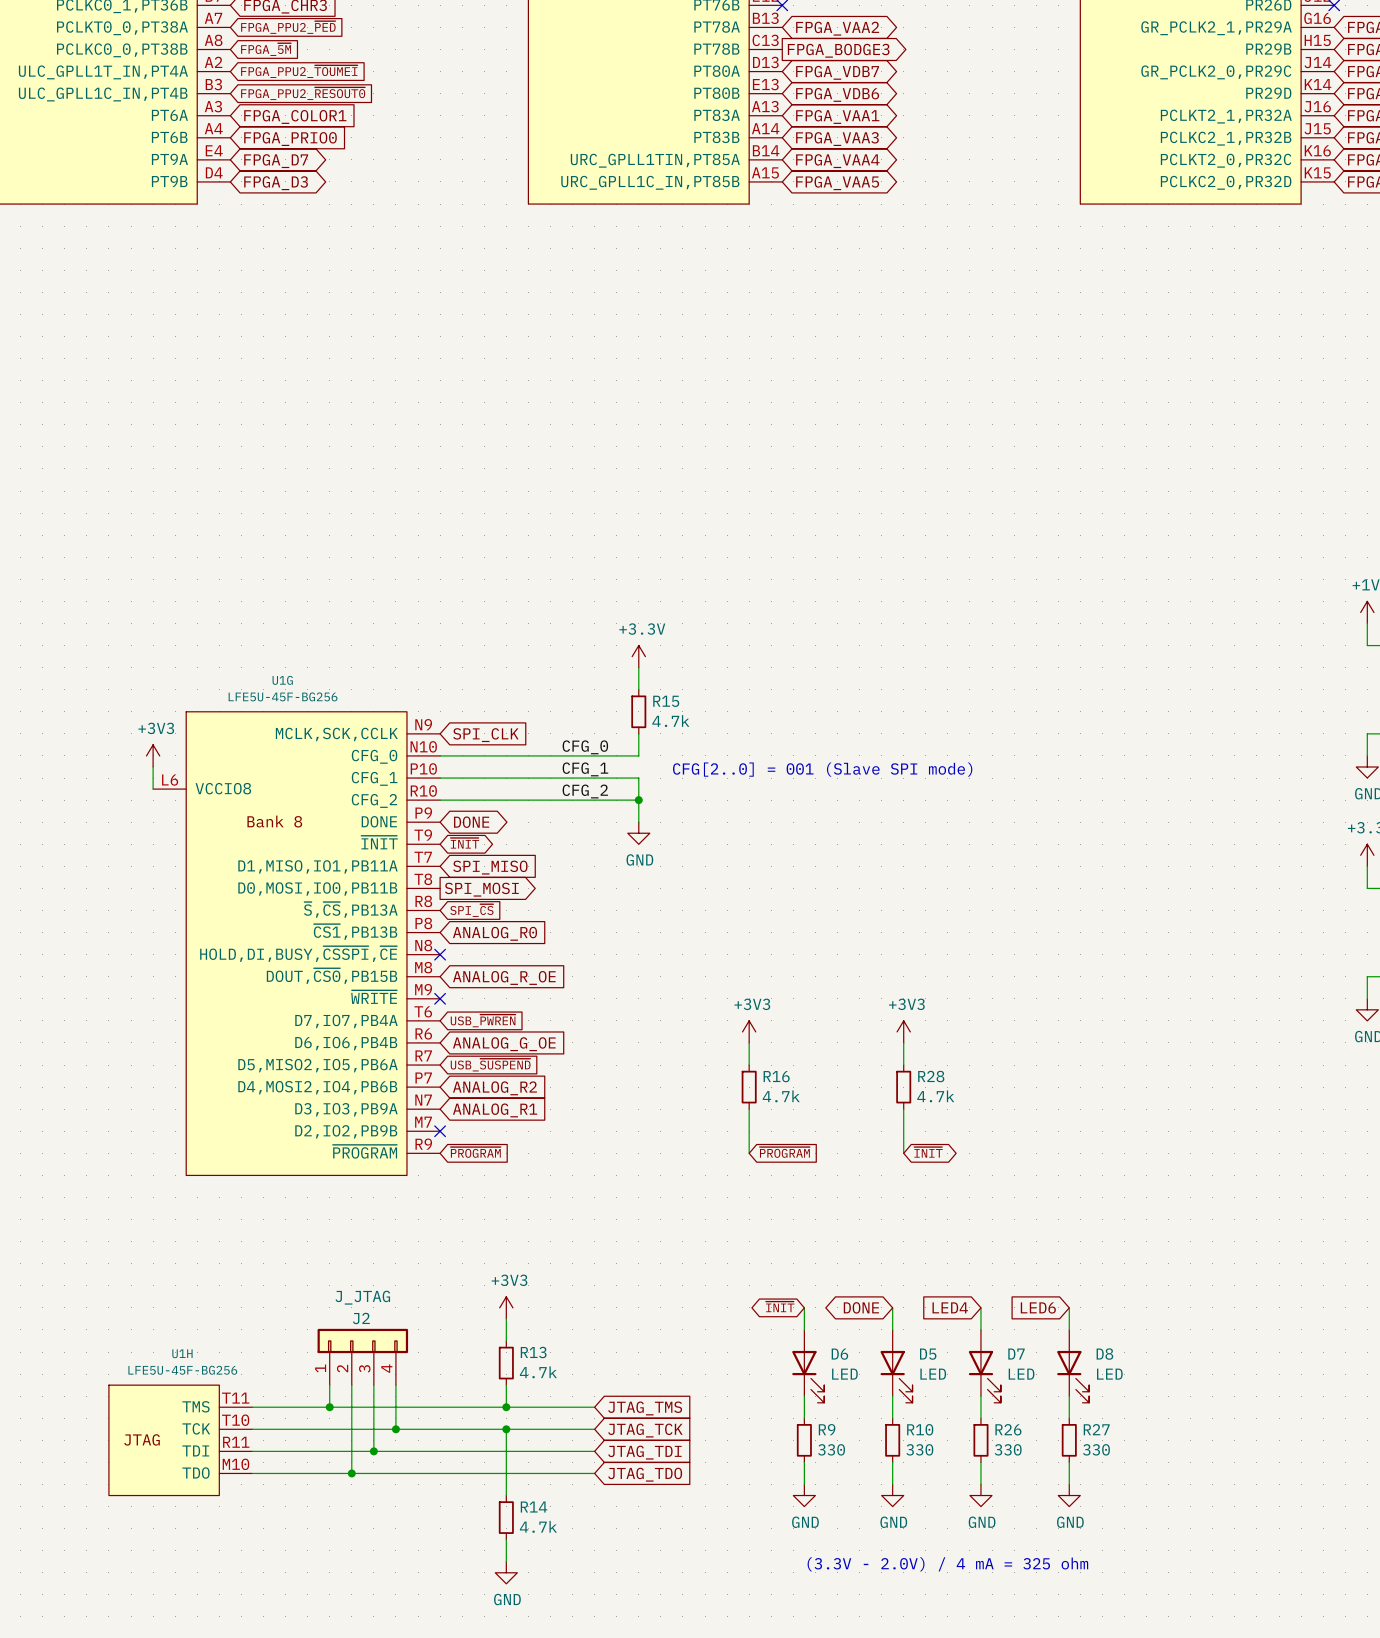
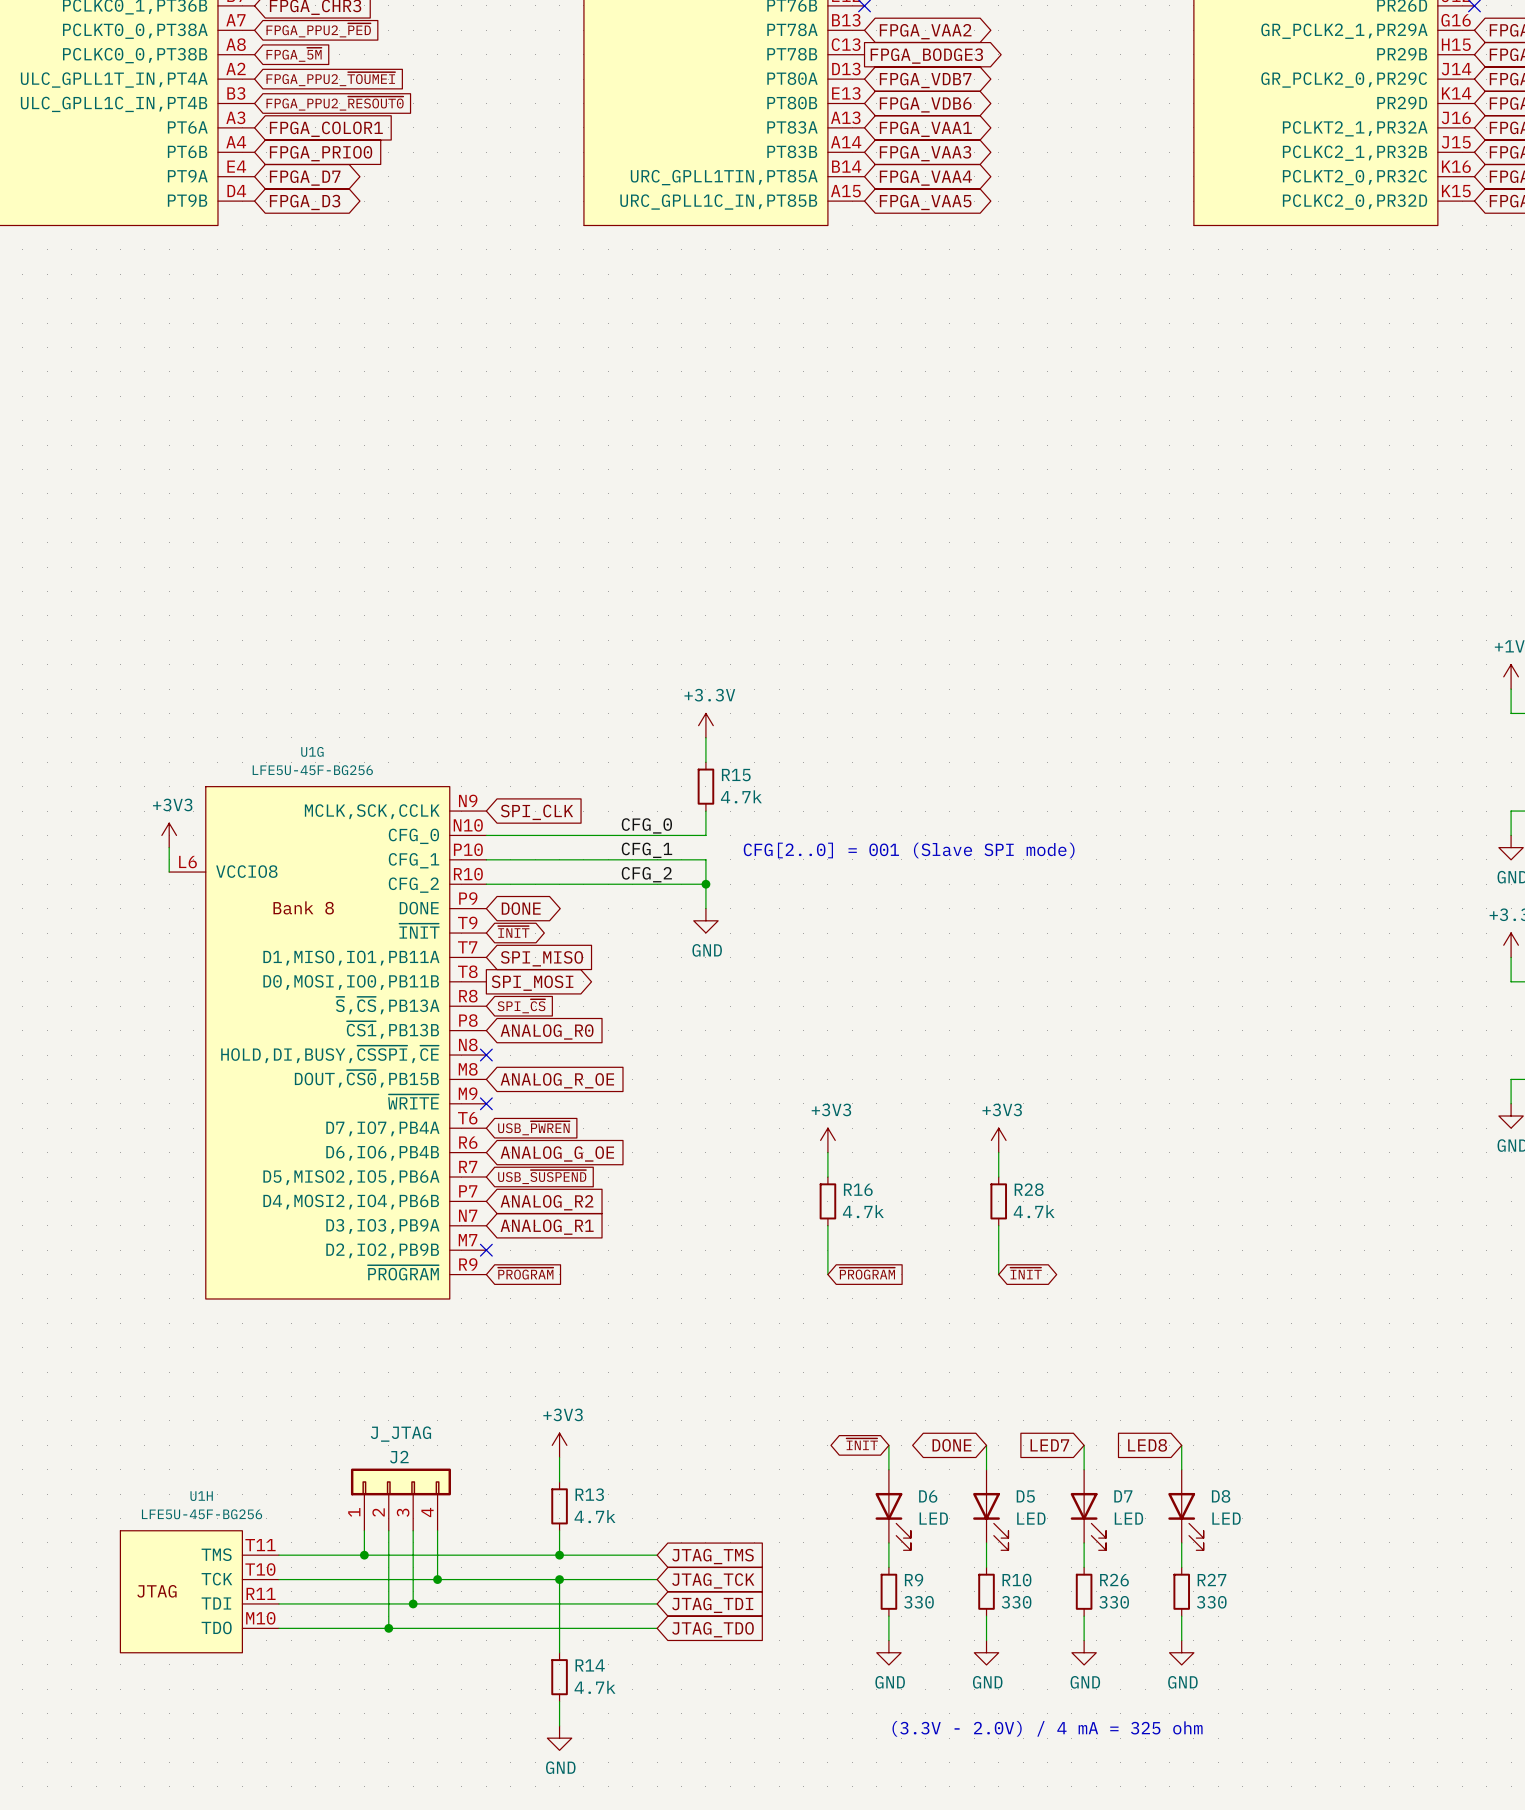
global label: LED4 (950, 1307) -> LED7 (1049, 1445)
global label: LED6 (1038, 1307) -> LED8 (1147, 1445)

